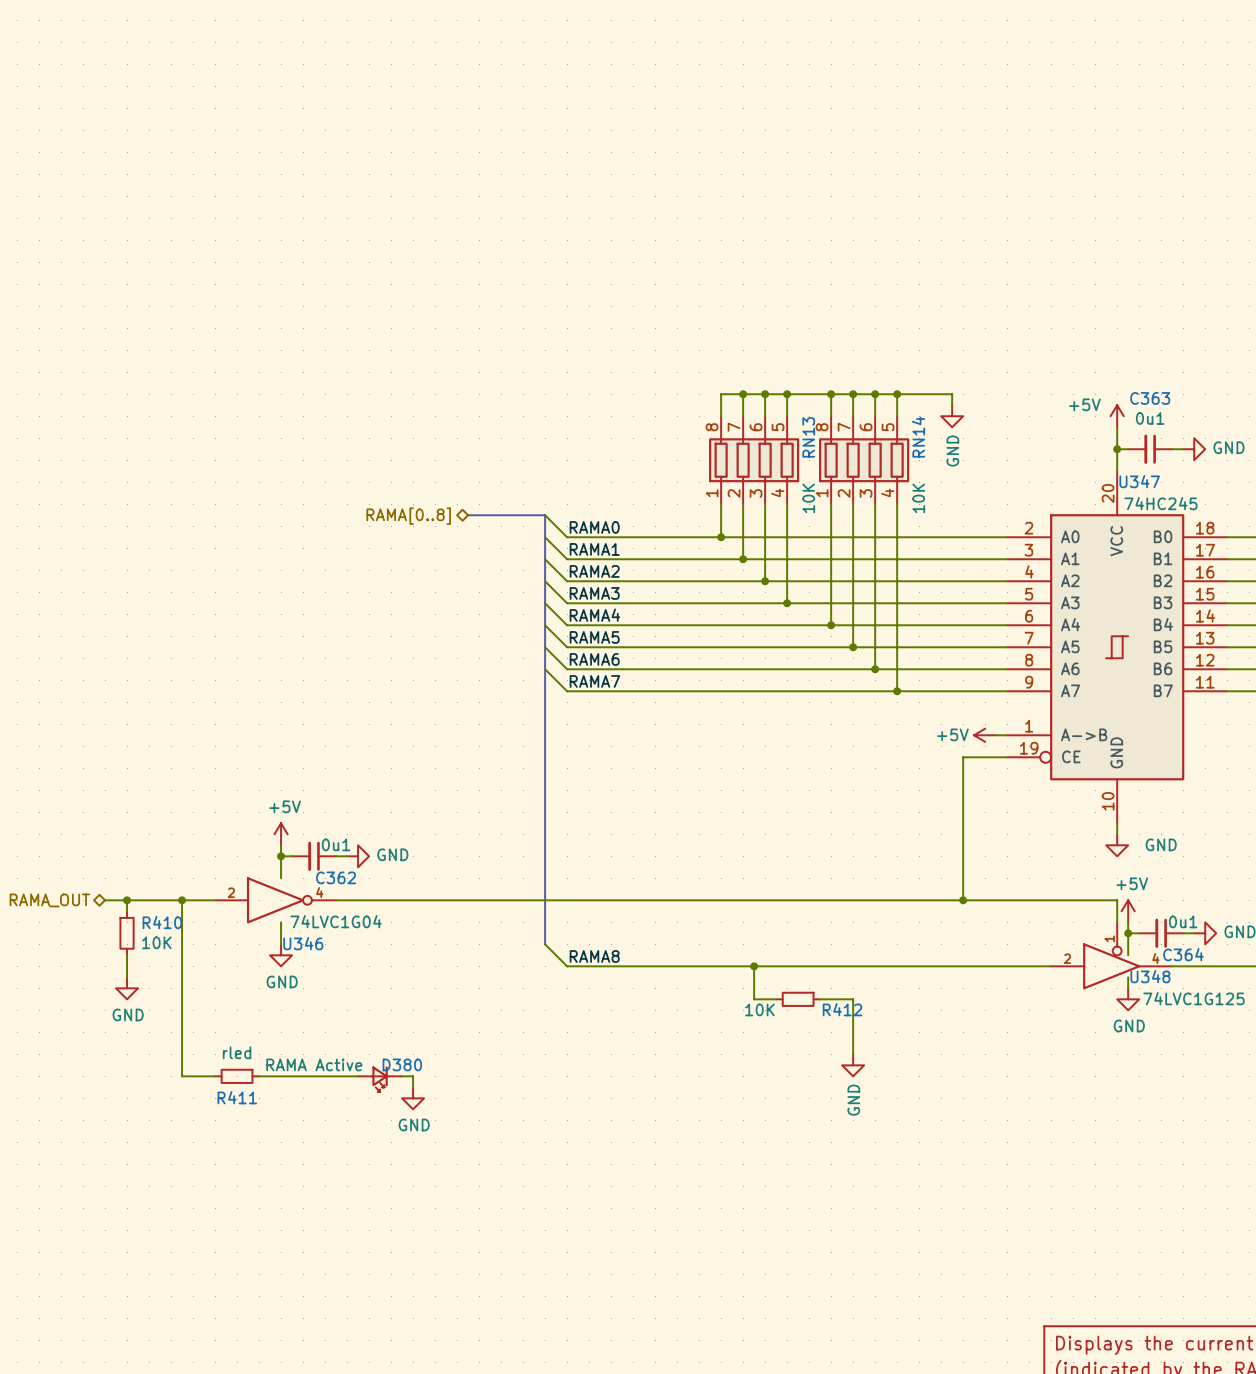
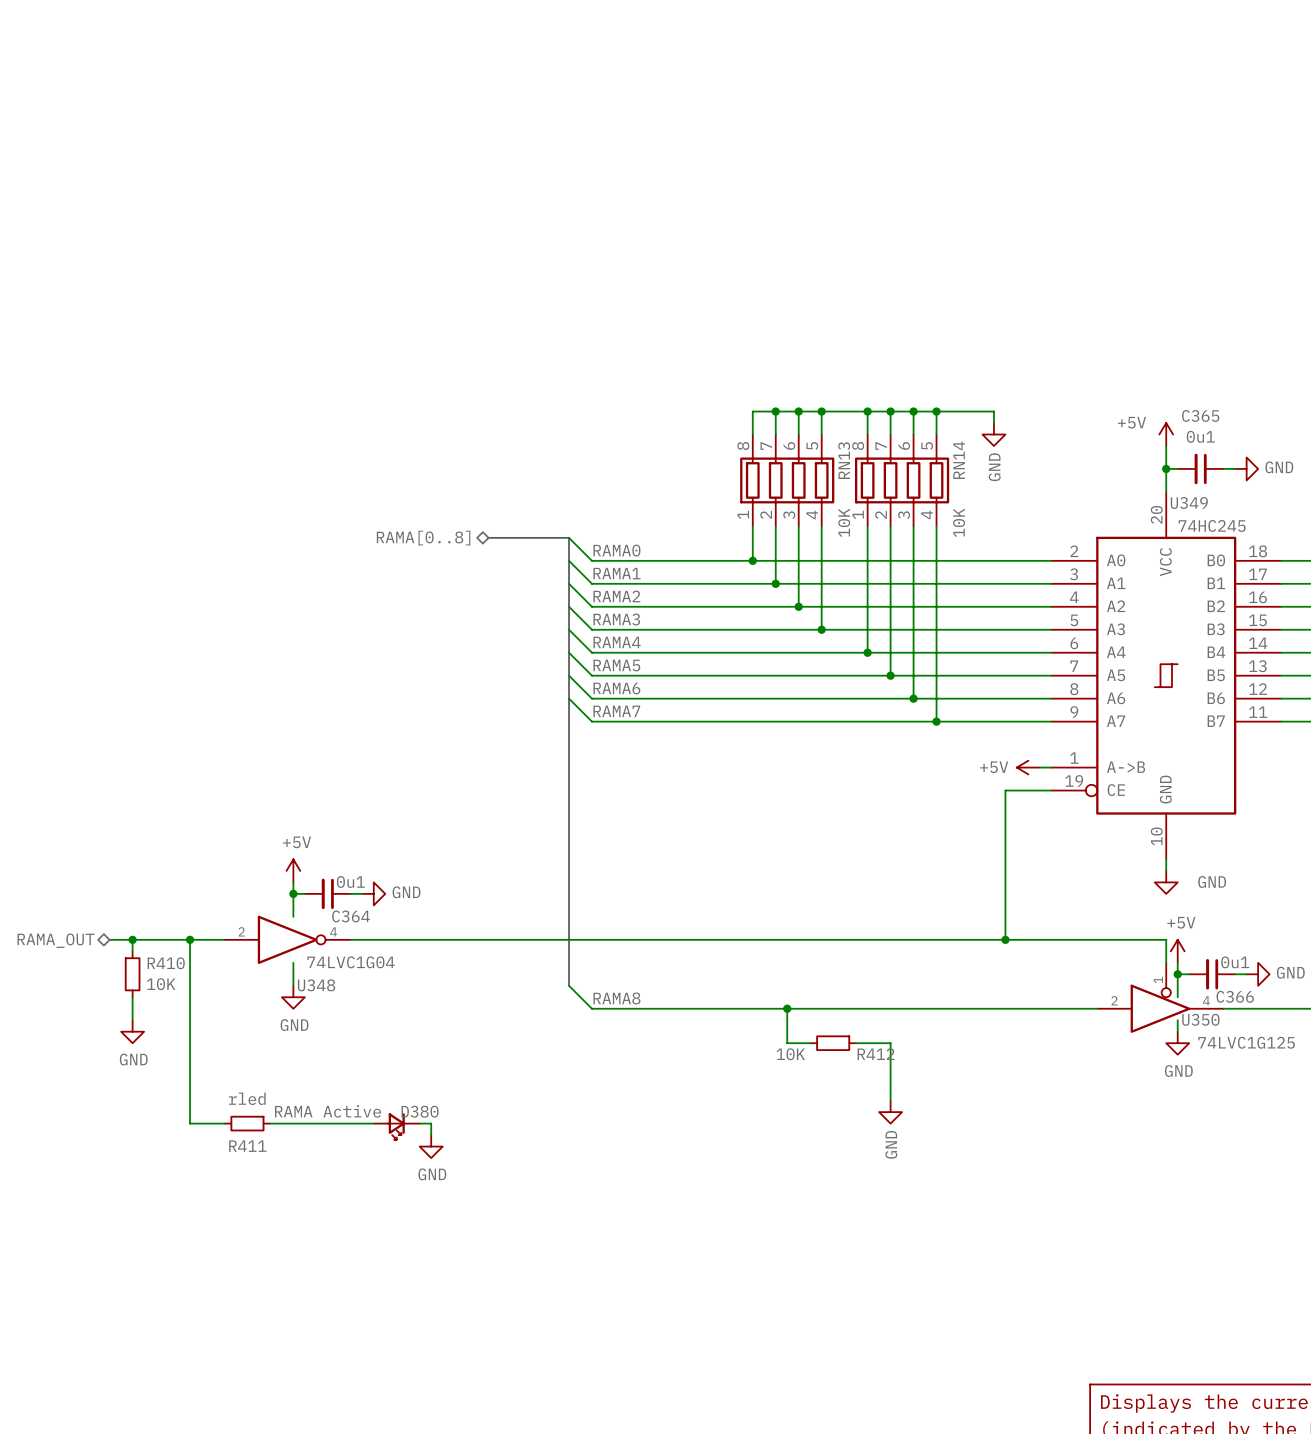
C363 name: C363 (1150, 398) -> C365 (1200, 415)
U347 name: U347 (1139, 481) -> U349 (1189, 502)
C362 name: C362 (336, 877) -> C364 (351, 916)
U346 name: U346 (303, 943) -> U348 (316, 985)
C364 name: C364 (1183, 954) -> C366 (1235, 996)
U348 name: U348 (1150, 976) -> U350 (1200, 1019)

